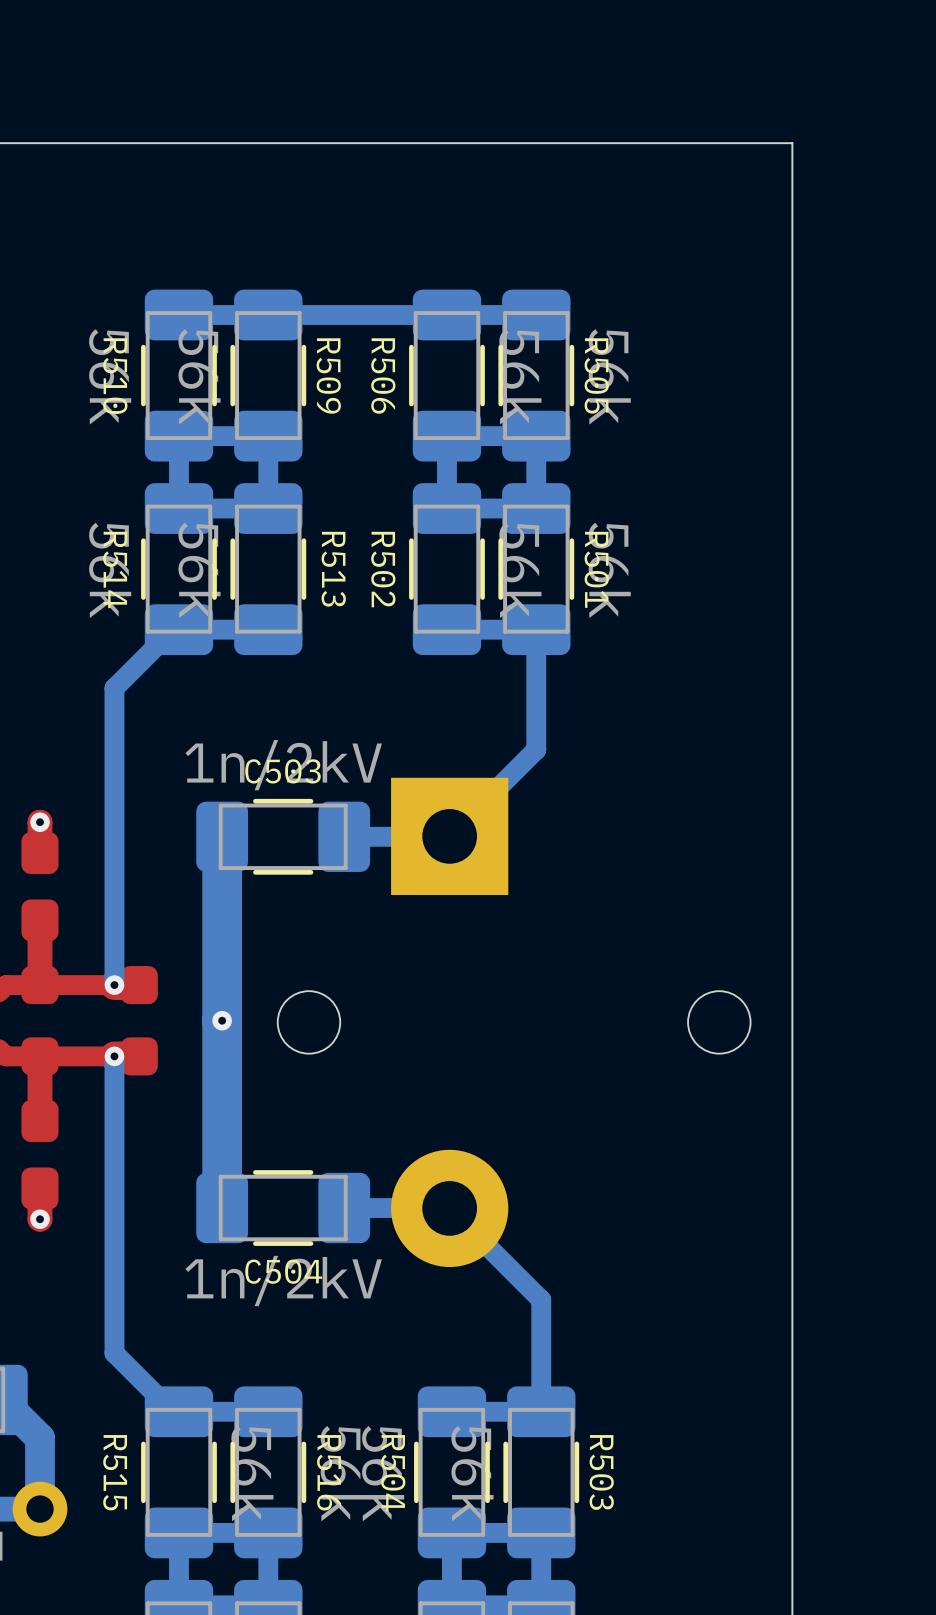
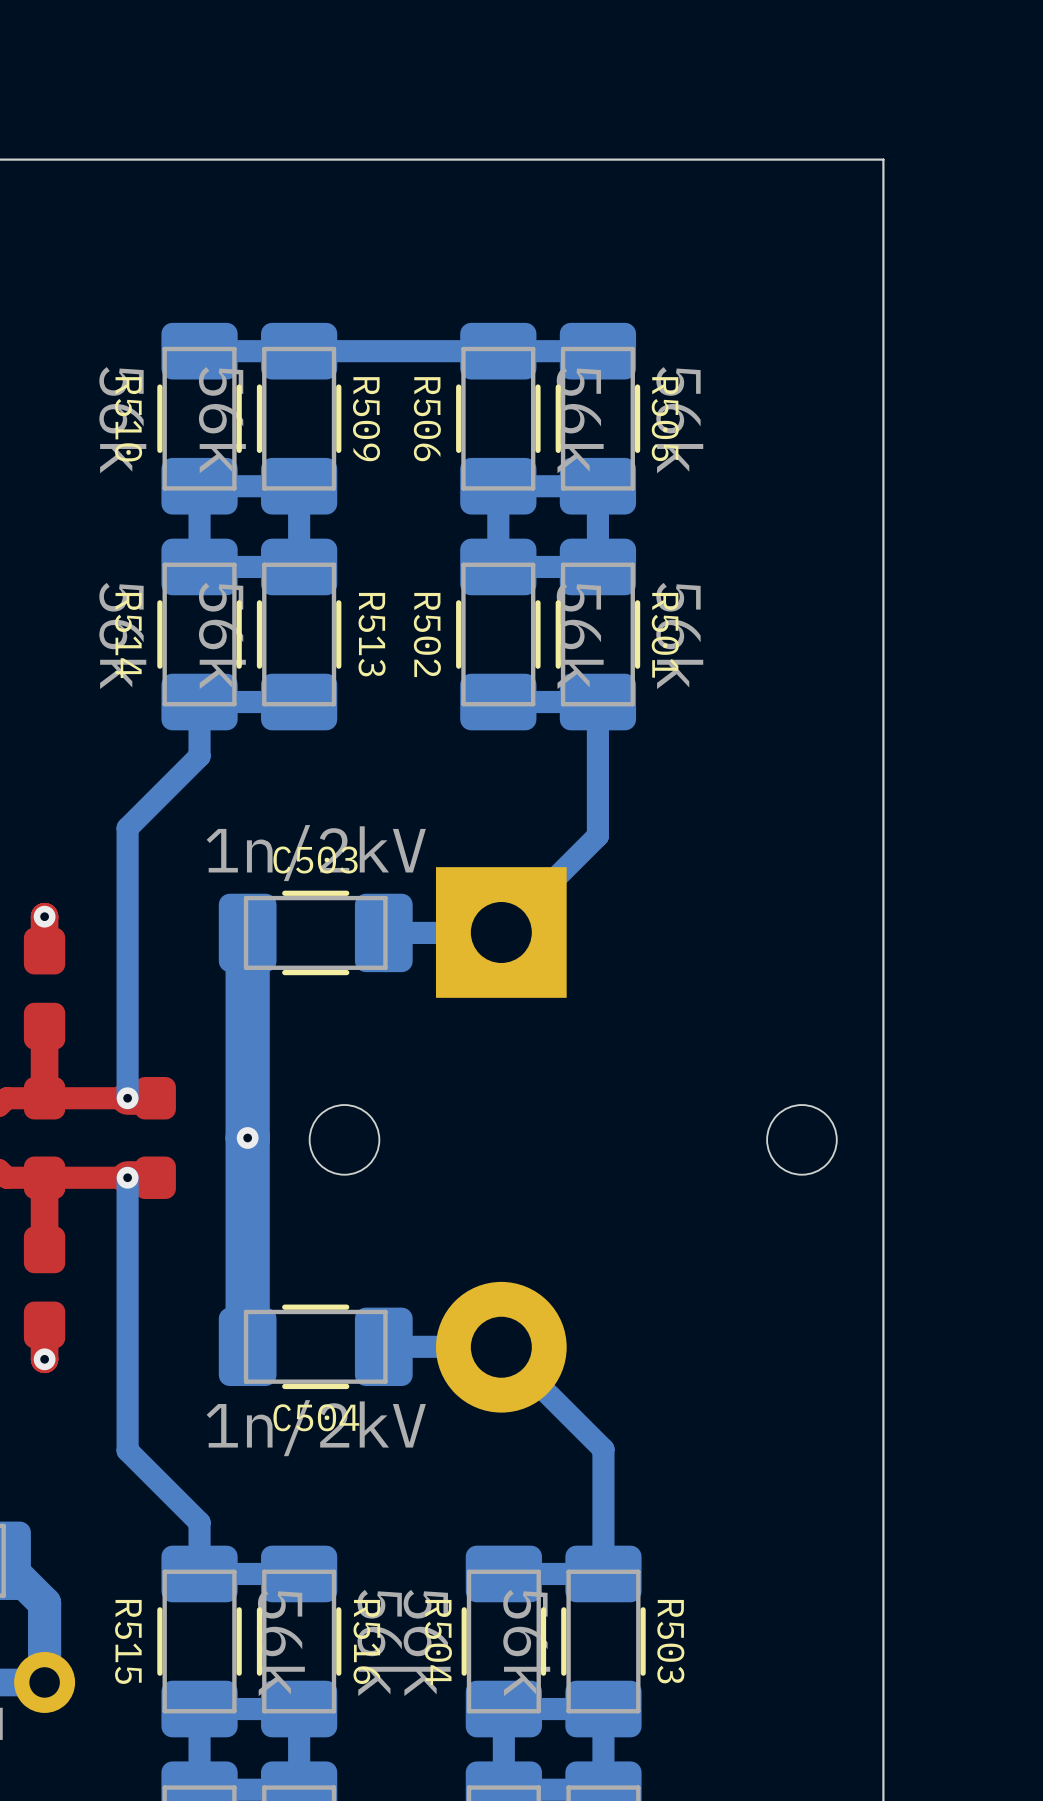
bottom track: (178, 629) (173, 629) (114, 688) (114, 742) -> (199, 702) (199, 756) (127, 828)
bottom track: (114, 1301) (114, 1353) (173, 1411) (178, 1411) -> (127, 1450) (199, 1522) (199, 1573)

